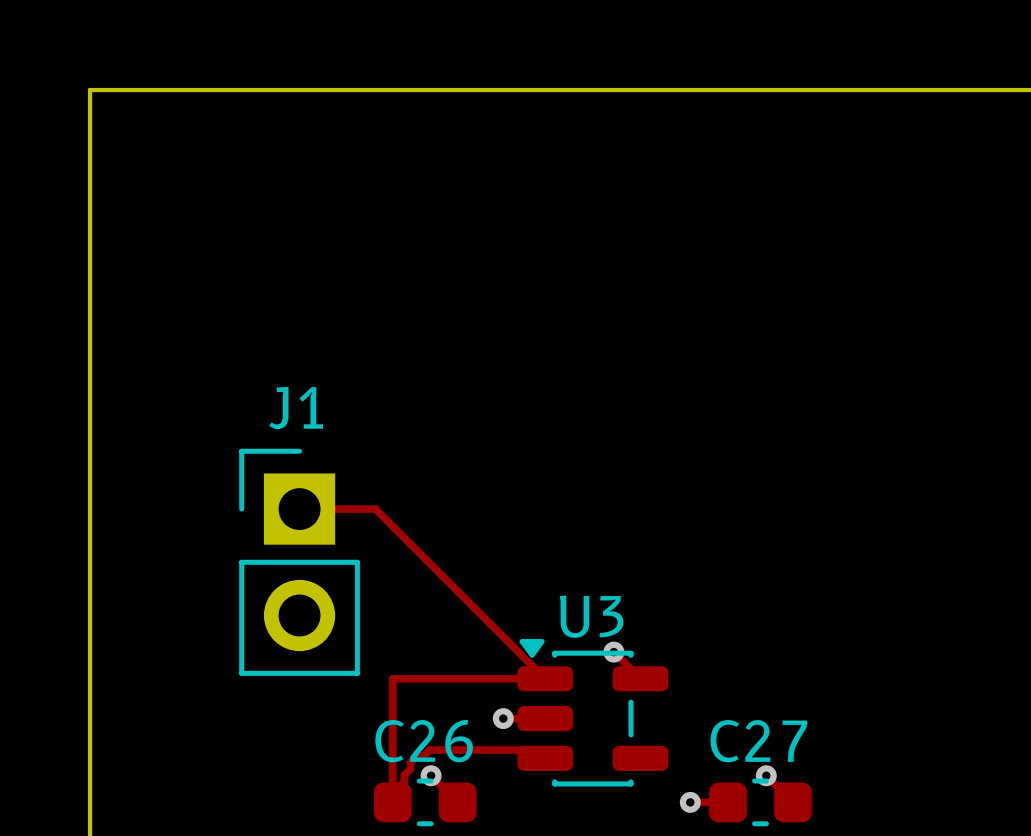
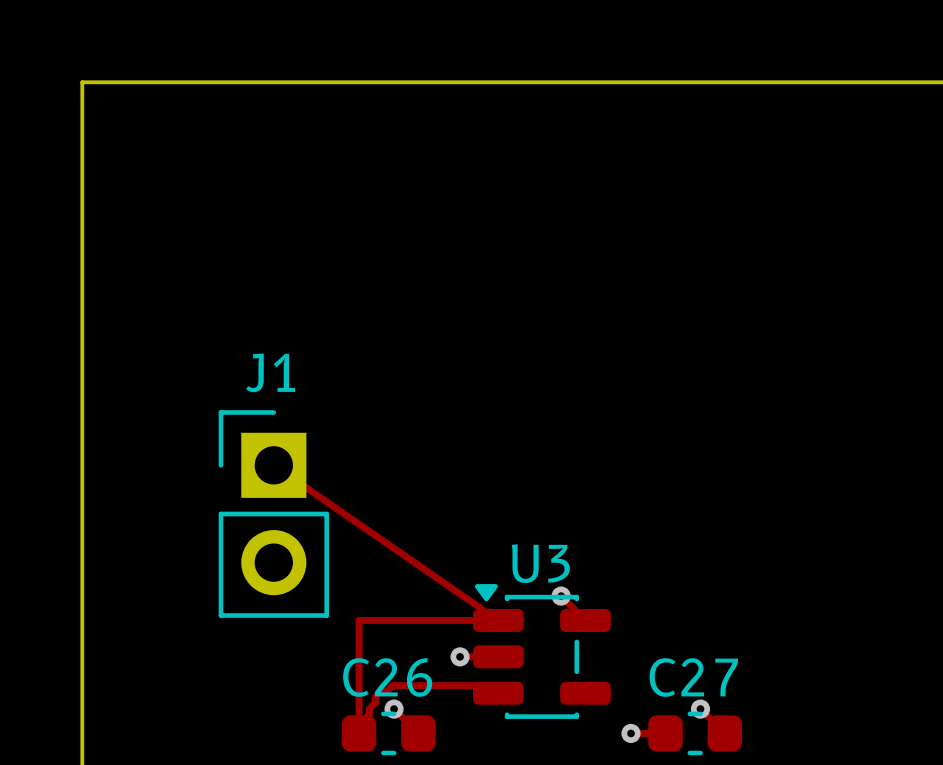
top track: (299, 509) (375, 509) (545, 678) -> (273, 465) (498, 620)

